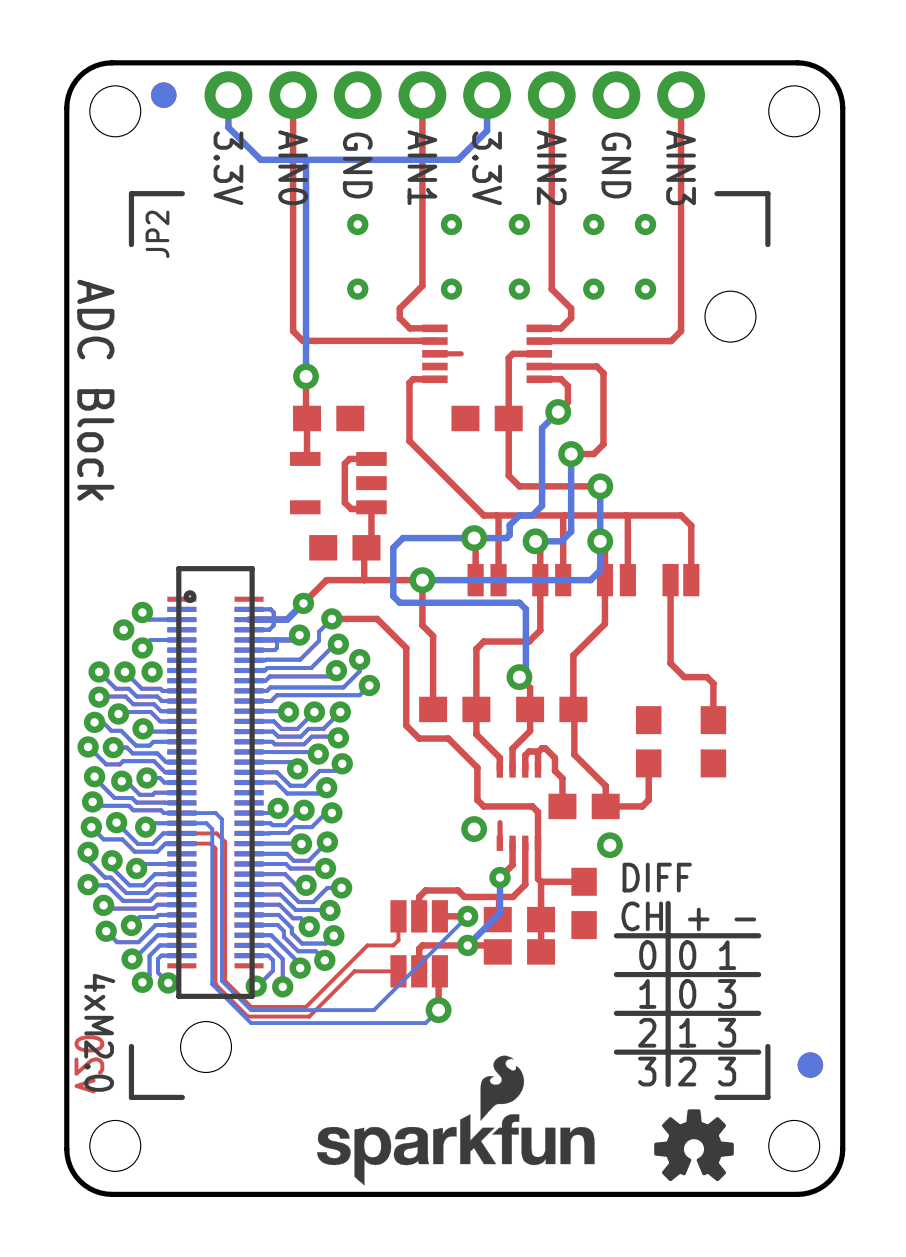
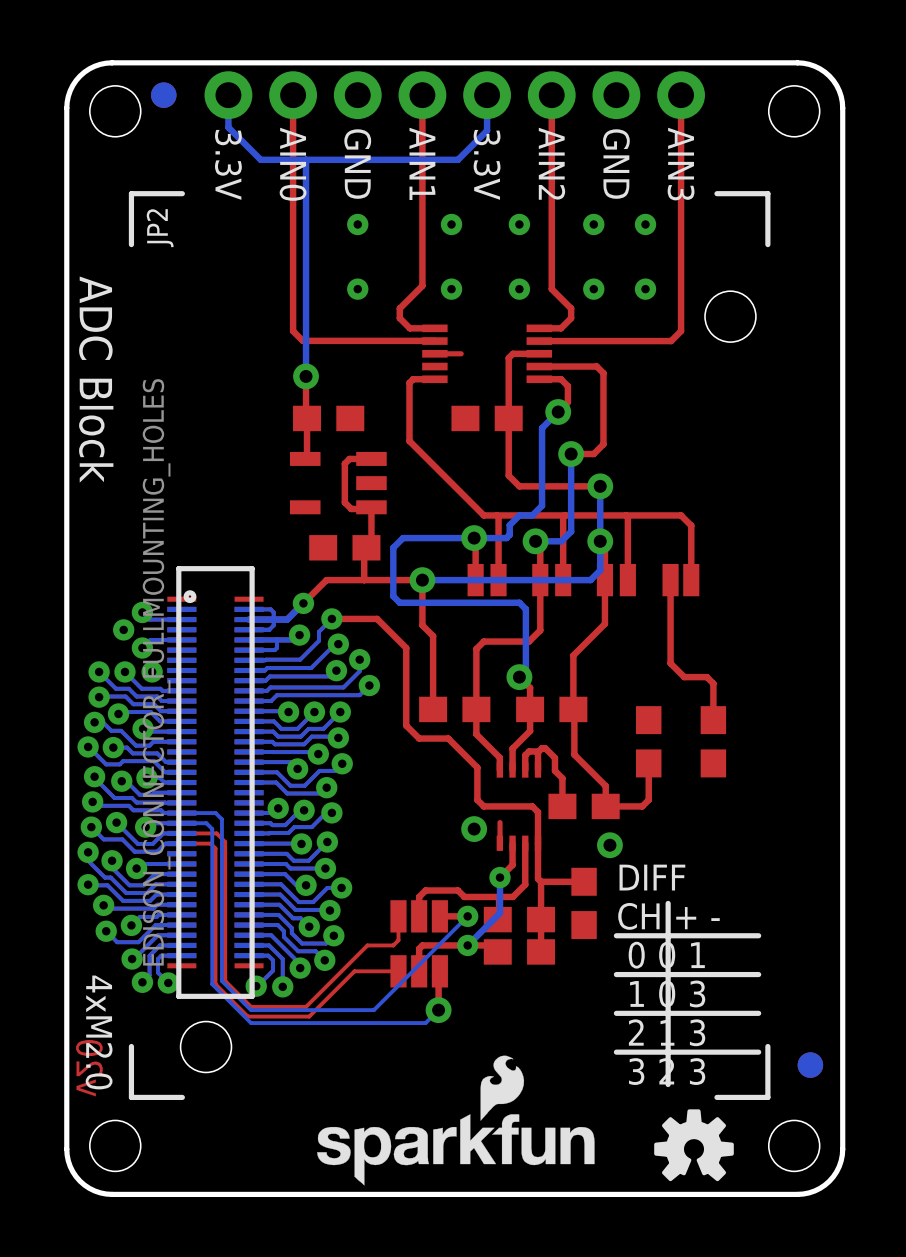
JP2 value: none -> EDISON_CONNECTOR_FULLMOUNTING_HOLES (156, 672)

